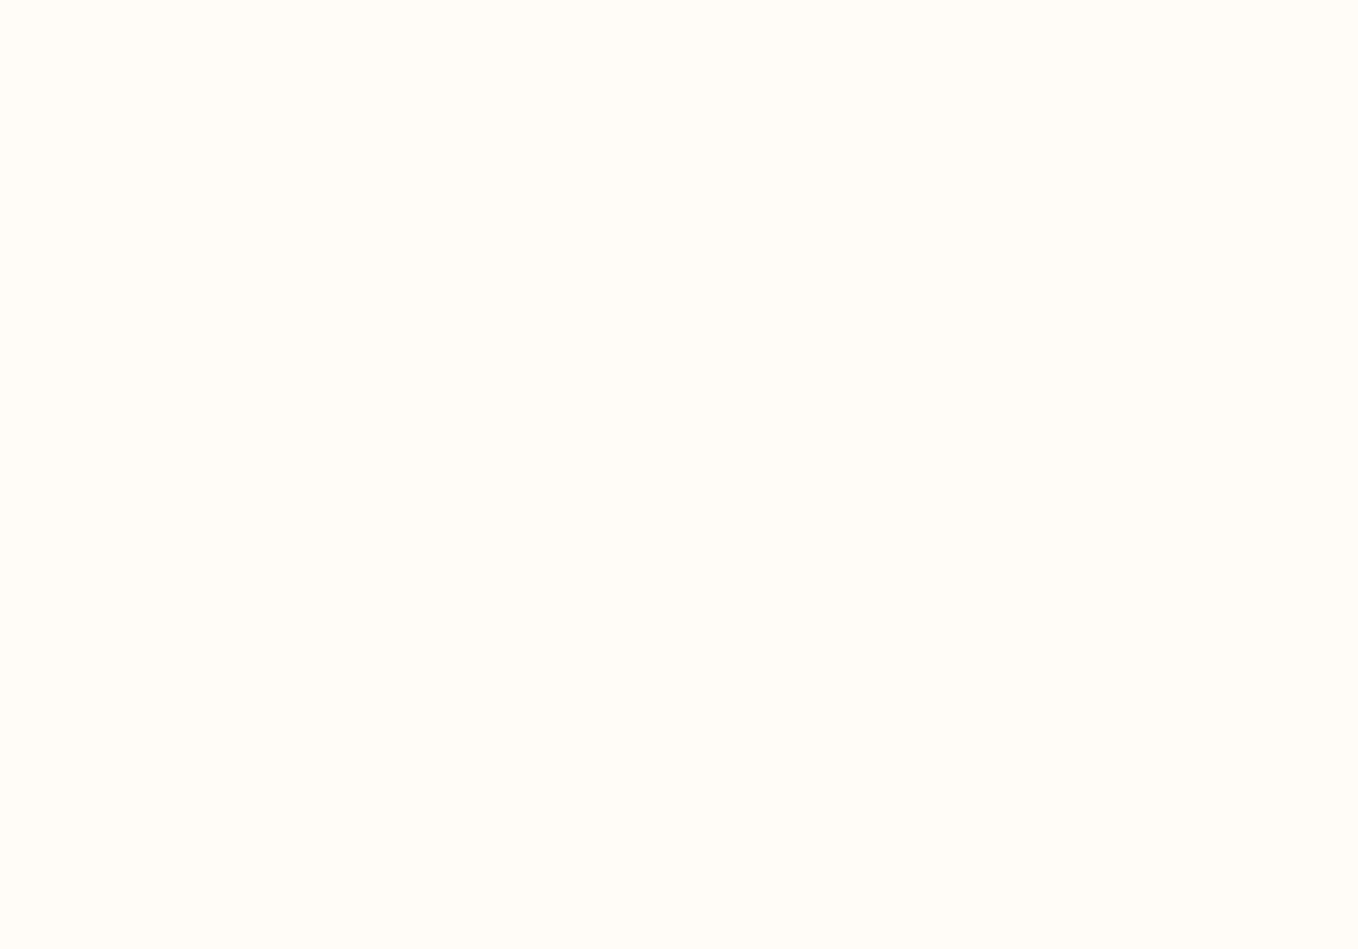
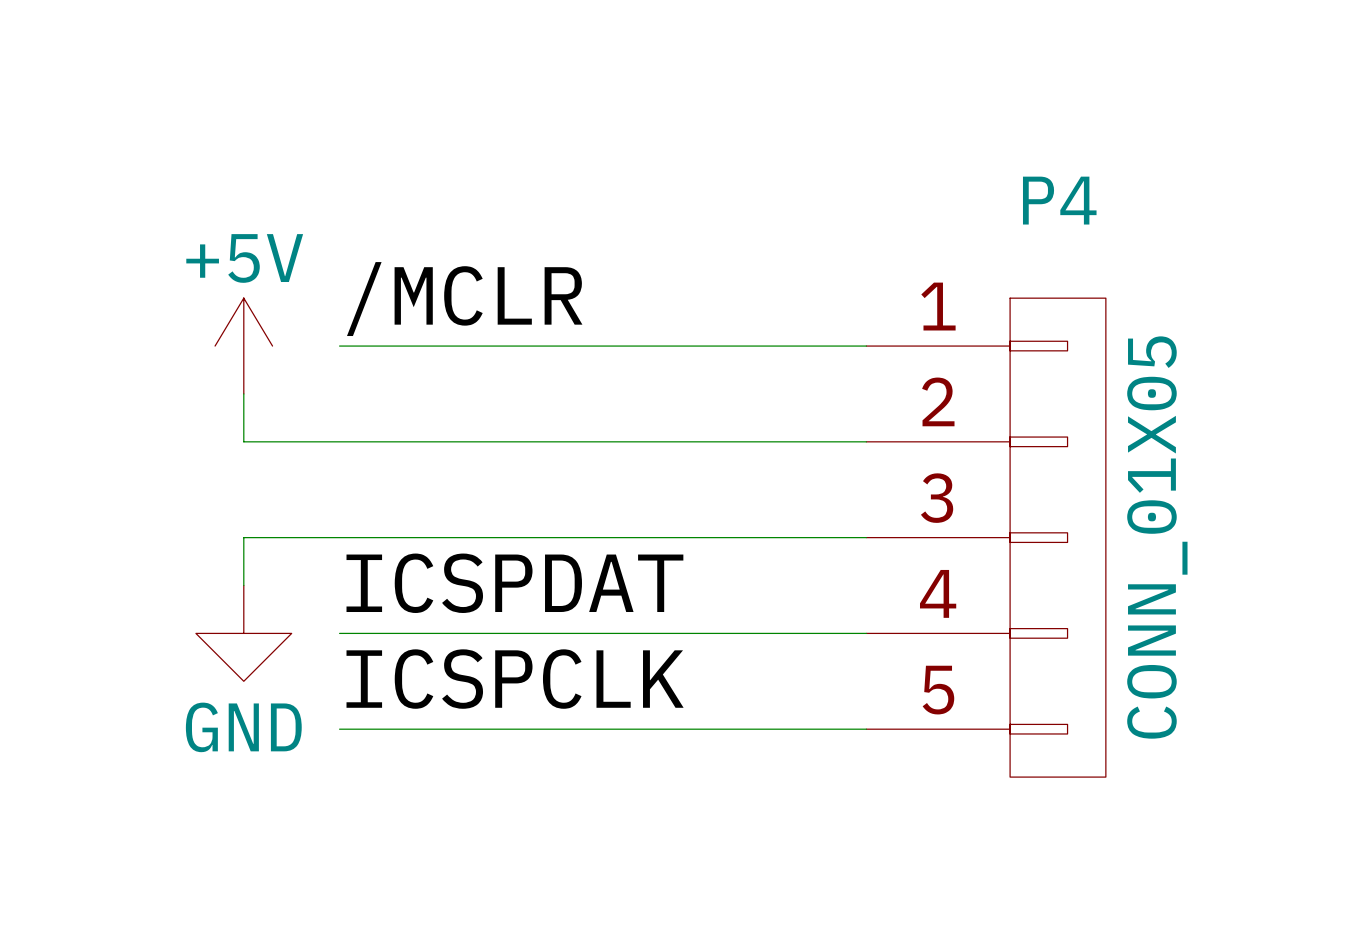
label: none -> /MCLR (464, 299)
power symbol: none -> +5V (243, 346)
wire: none -> (339, 346) (866, 346)
wire: none -> (243, 393) (243, 441) (866, 441)
wire: none -> (866, 537) (243, 537) (243, 585)
P4: none -> CONN_01X05 (986, 537)
label: none -> ICSPDAT (514, 583)
power symbol: none -> GND (243, 633)
wire: none -> (339, 633) (866, 633)
label: none -> ICSPCLK (515, 679)
wire: none -> (339, 729) (866, 729)

